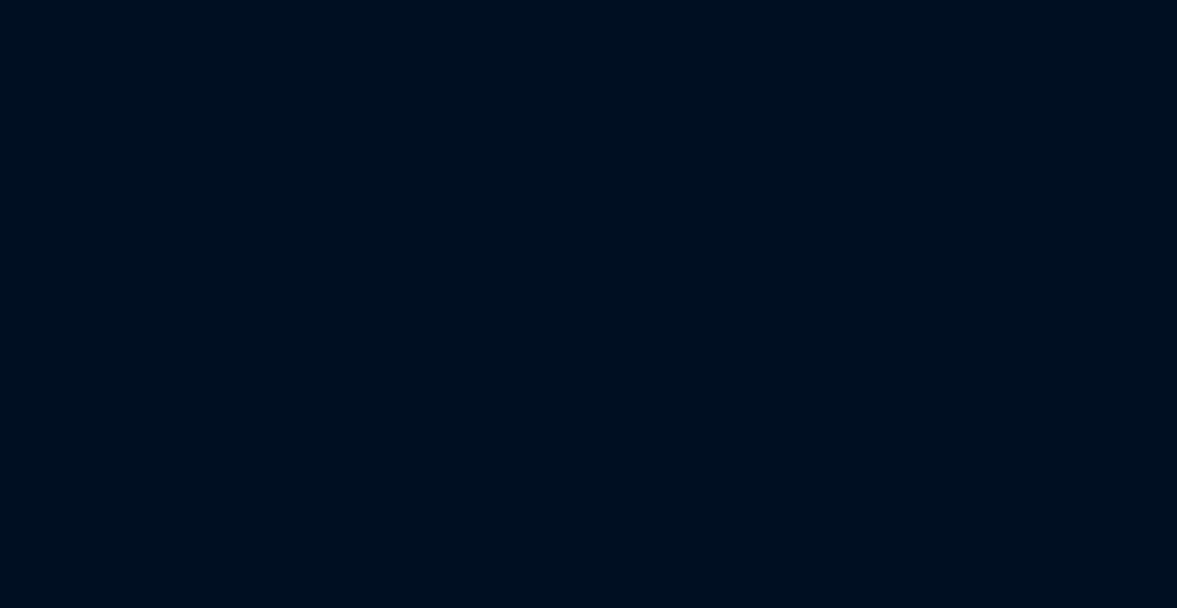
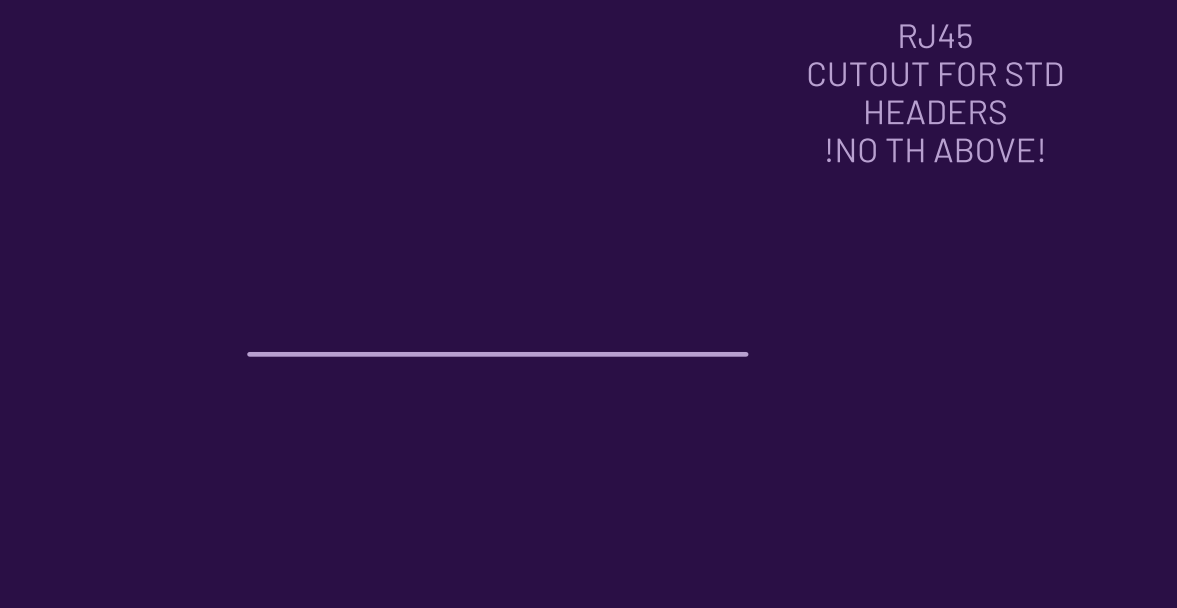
text: none -> RJ45 (936, 36)
text: none -> CUTOUT FOR STD (935, 74)
text: none -> HEADERS (935, 112)
text: none -> !NO TH ABOVE! (935, 150)
line: none -> (249, 354) (746, 354)

